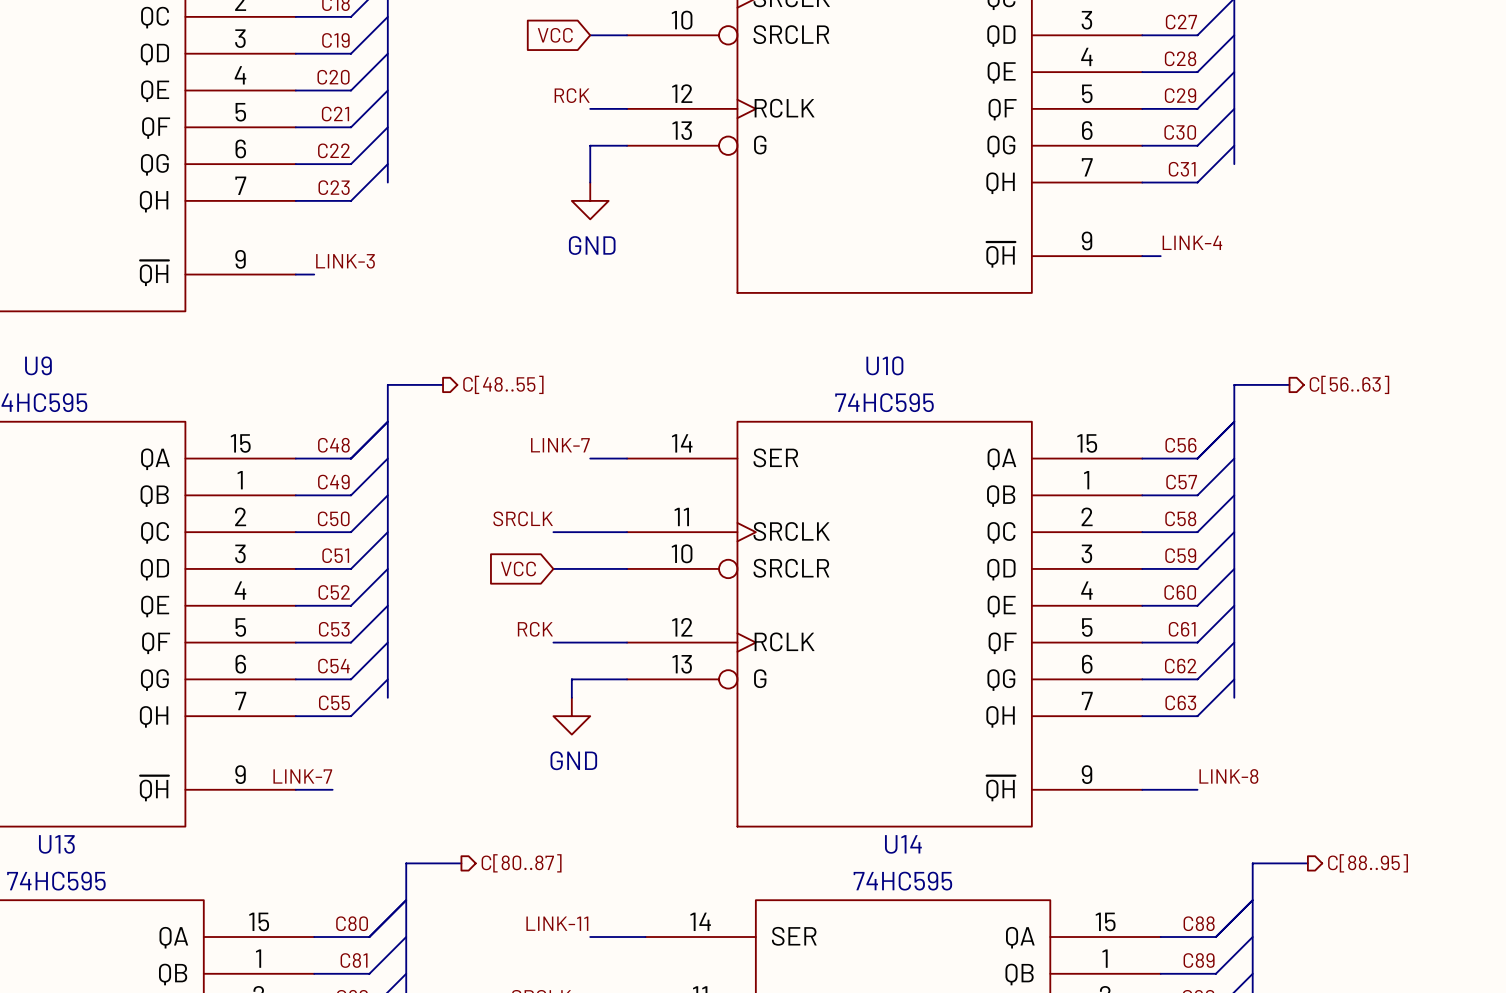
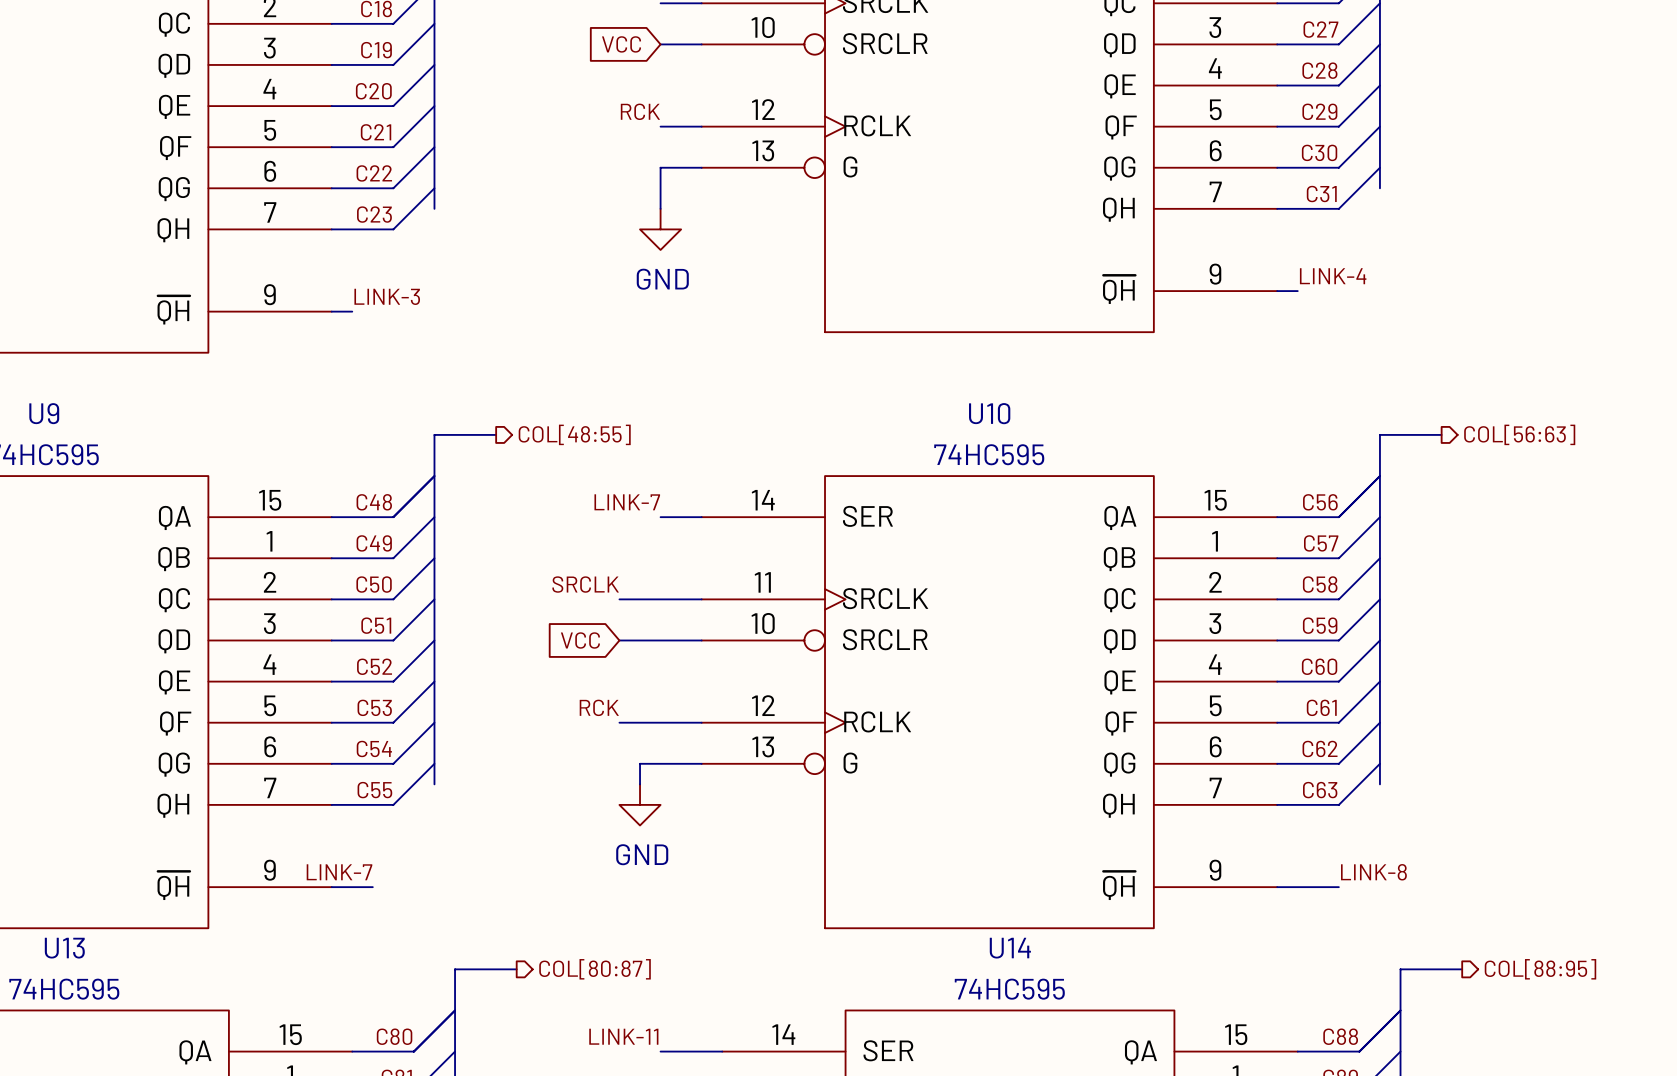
hierarchical label: C[48..55] (503, 384) -> COL[48:55] (574, 434)
hierarchical label: C[56..63] (1349, 384) -> COL[56:63] (1519, 434)
hierarchical label: C[80..87] (521, 863) -> COL[80:87] (595, 969)
hierarchical label: C[88..95] (1368, 863) -> COL[88:95] (1540, 969)

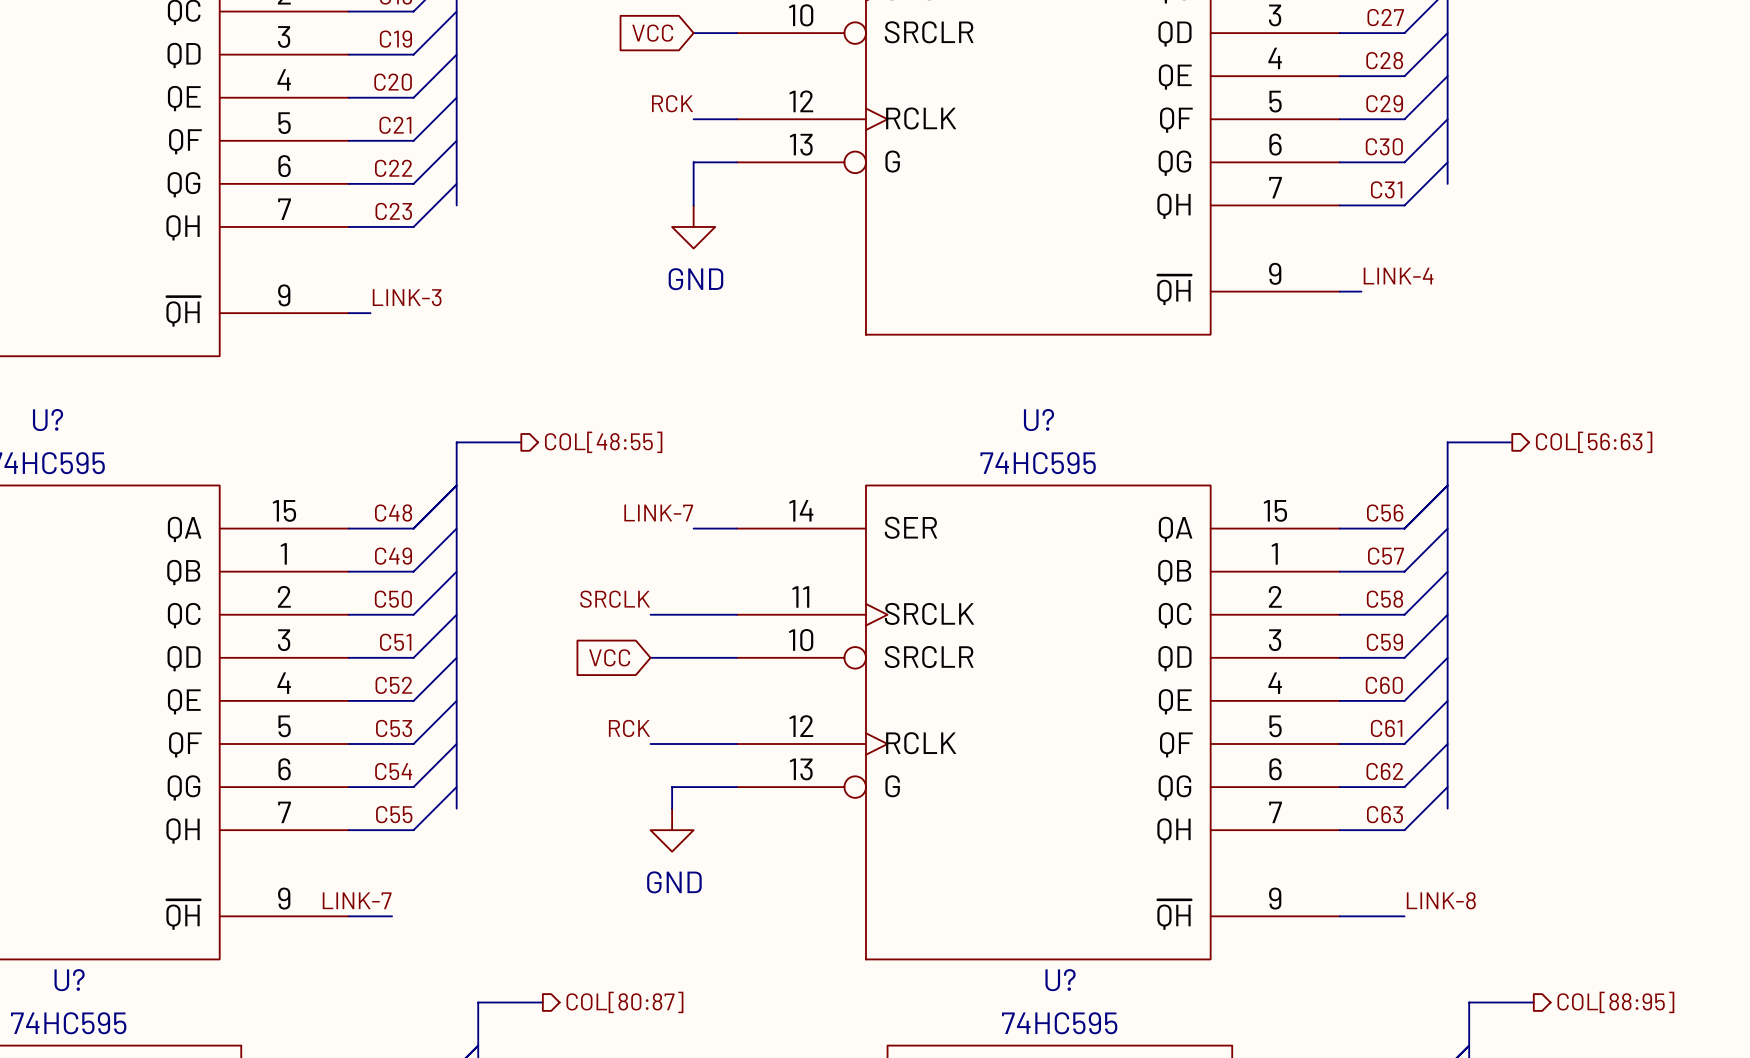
U9 name: U9 (44, 413) -> U? (48, 420)
U10 name: U10 (989, 413) -> U? (1038, 420)
U13 name: U13 (64, 948) -> U? (69, 980)
U14 name: U14 (1010, 948) -> U? (1060, 980)

